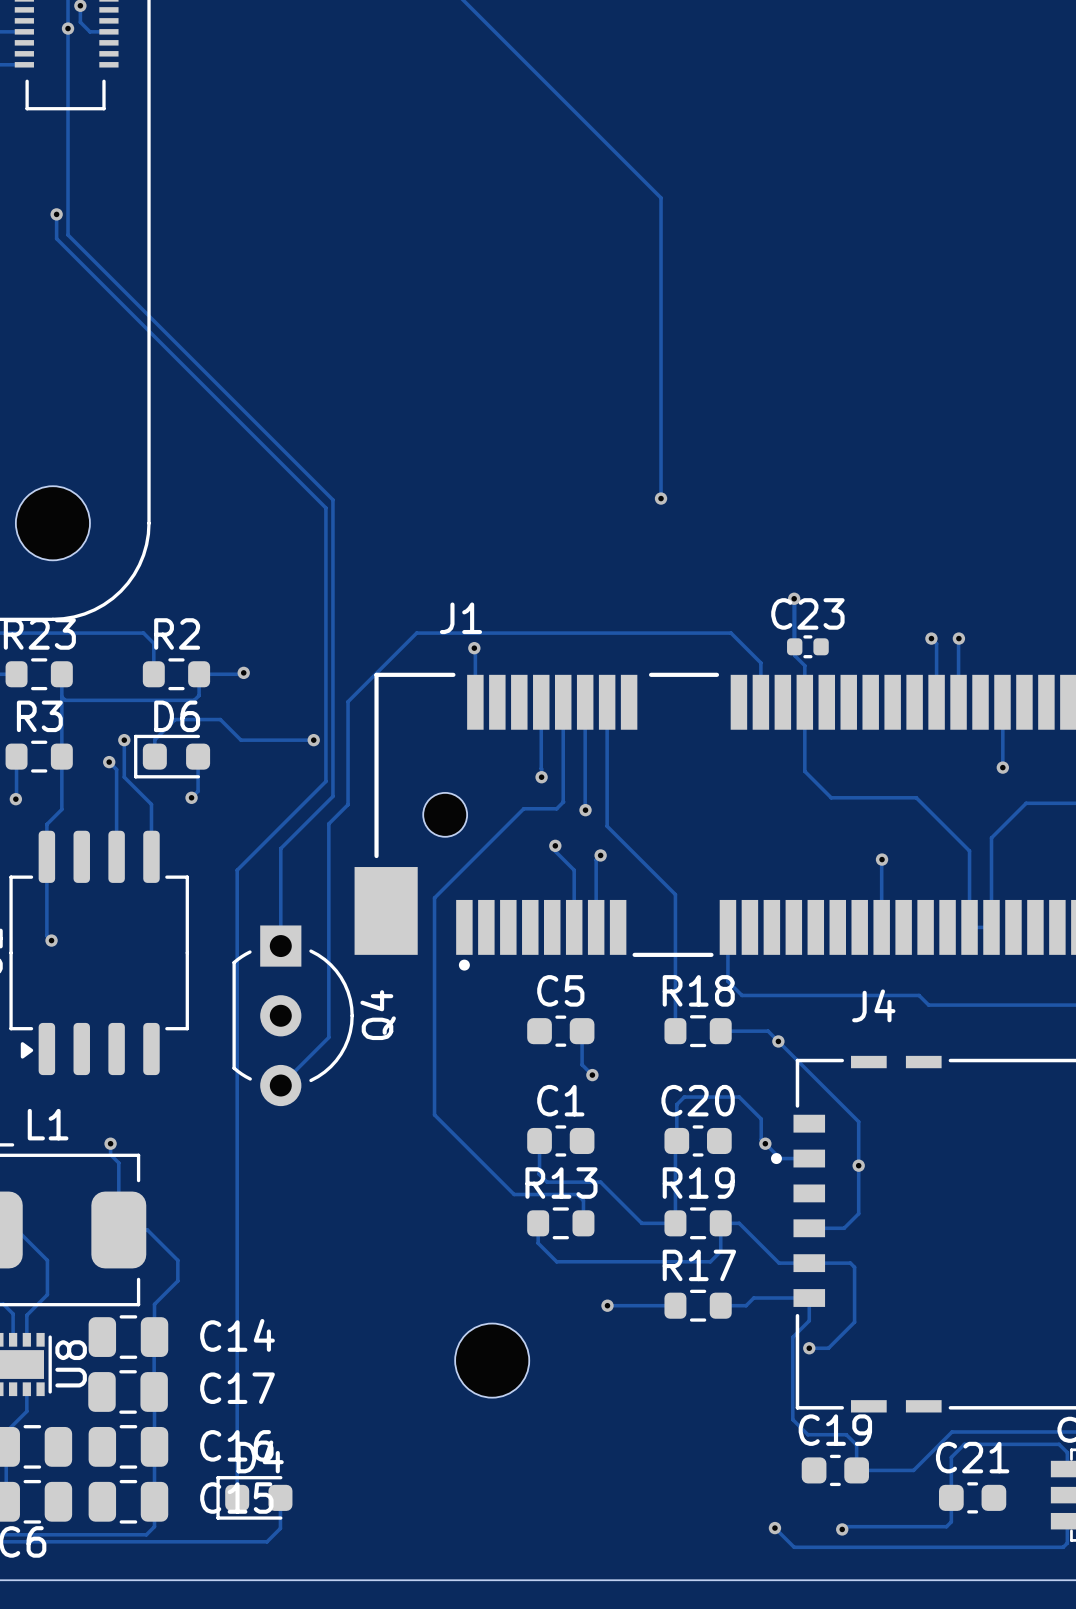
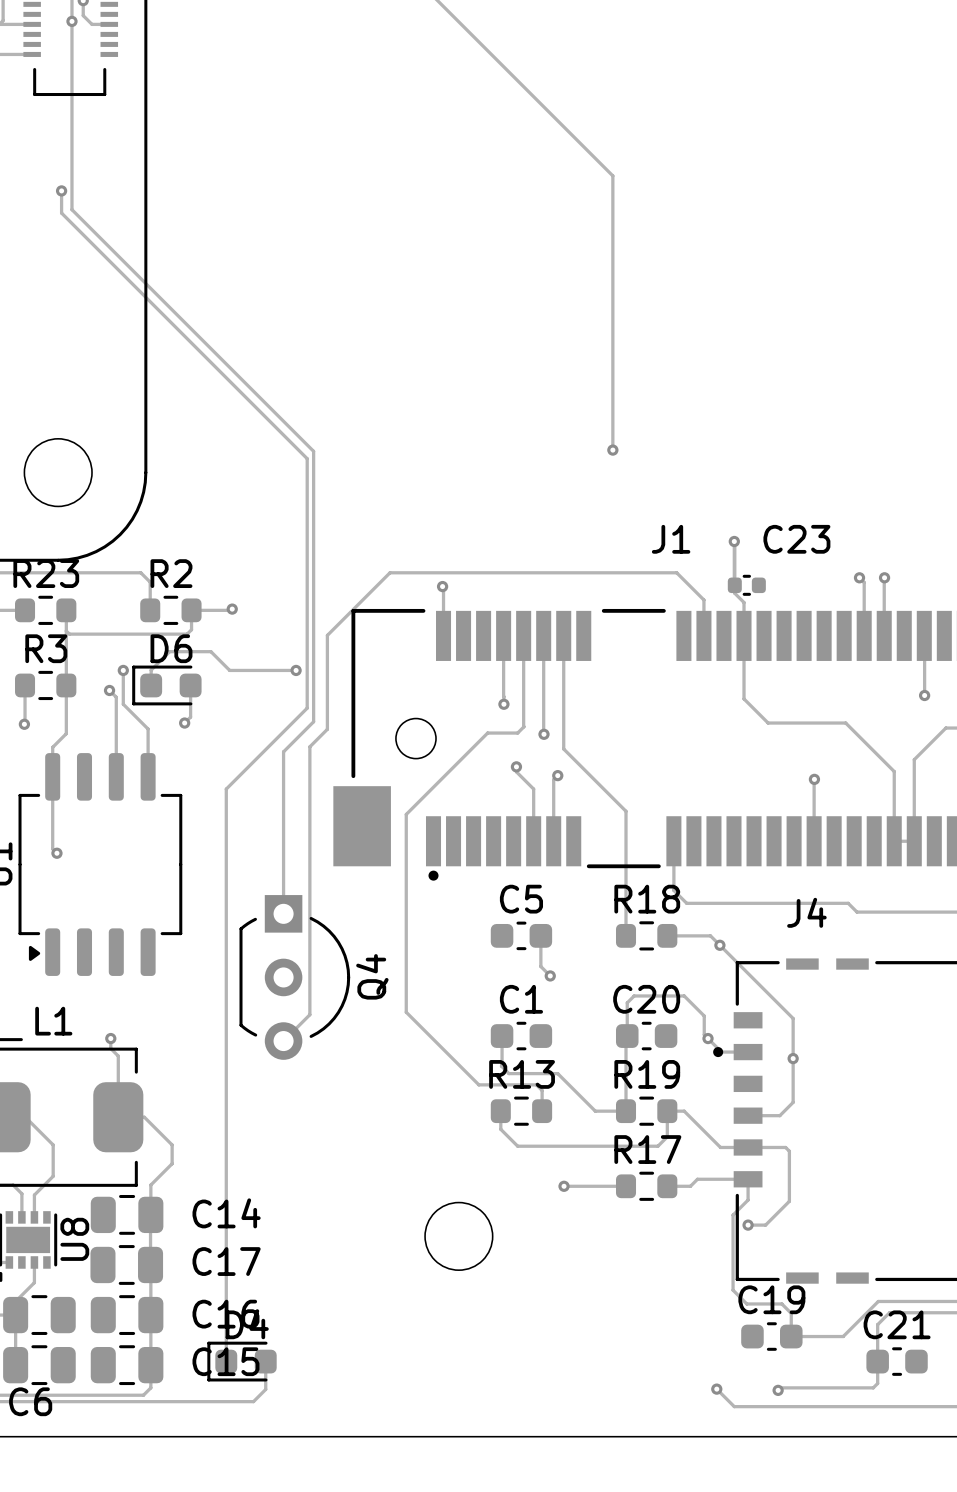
C23 name position: C23 (807, 613) -> C23 (796, 539)
J1 name position: J1 (460, 618) -> J1 (671, 539)
track: (300, 829) (280, 848) (280, 946) -> (283, 751) (283, 913)
Q4 position: (293, 1015) -> (294, 977)
track: (328, 1037) (280, 1085) -> (309, 941) (309, 1014) (283, 1041)

